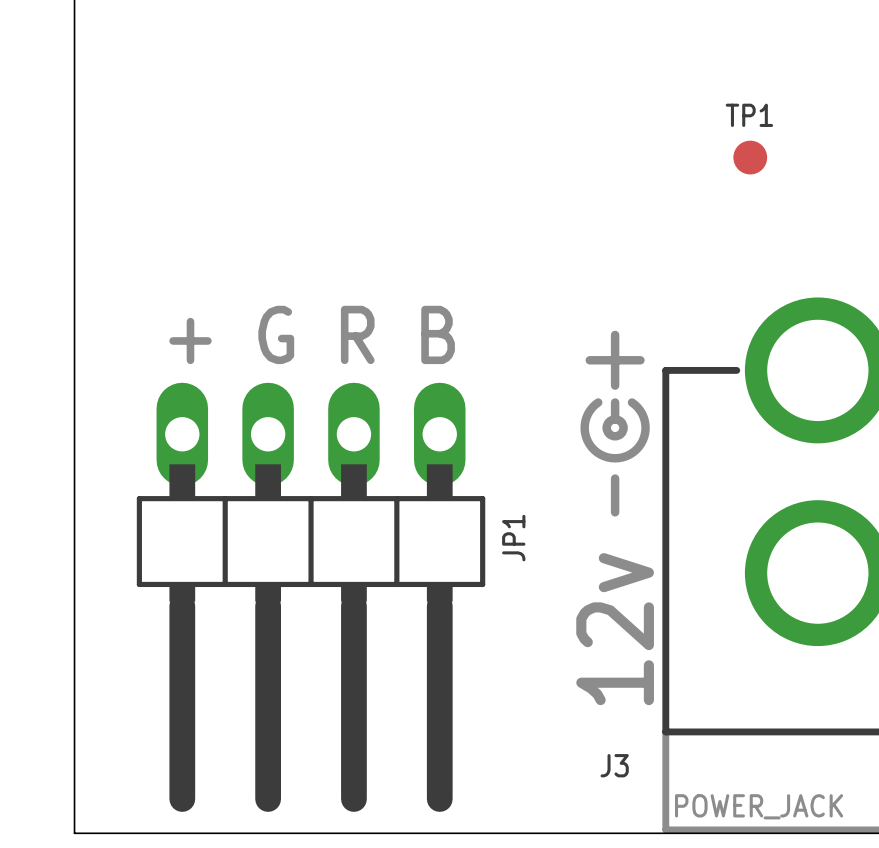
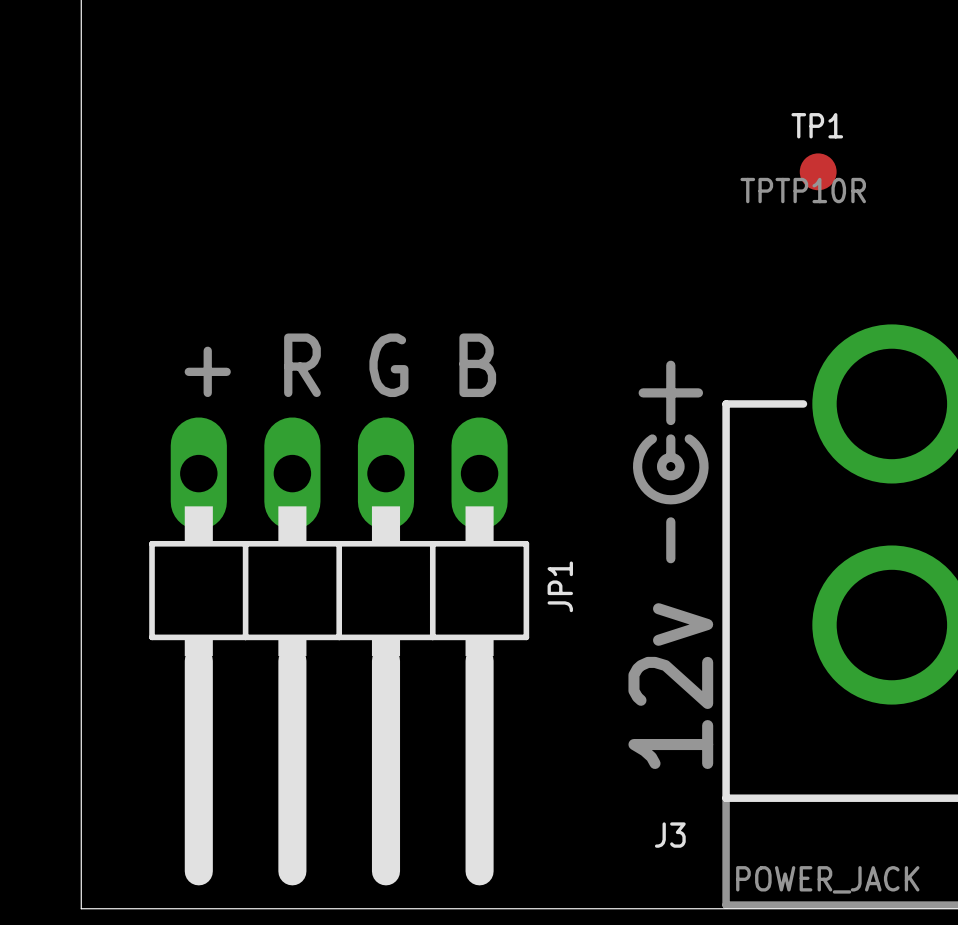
TP1 value: none -> TPTP10R (803, 190)
text: + G R B (312, 334) -> + R G B (340, 365)

